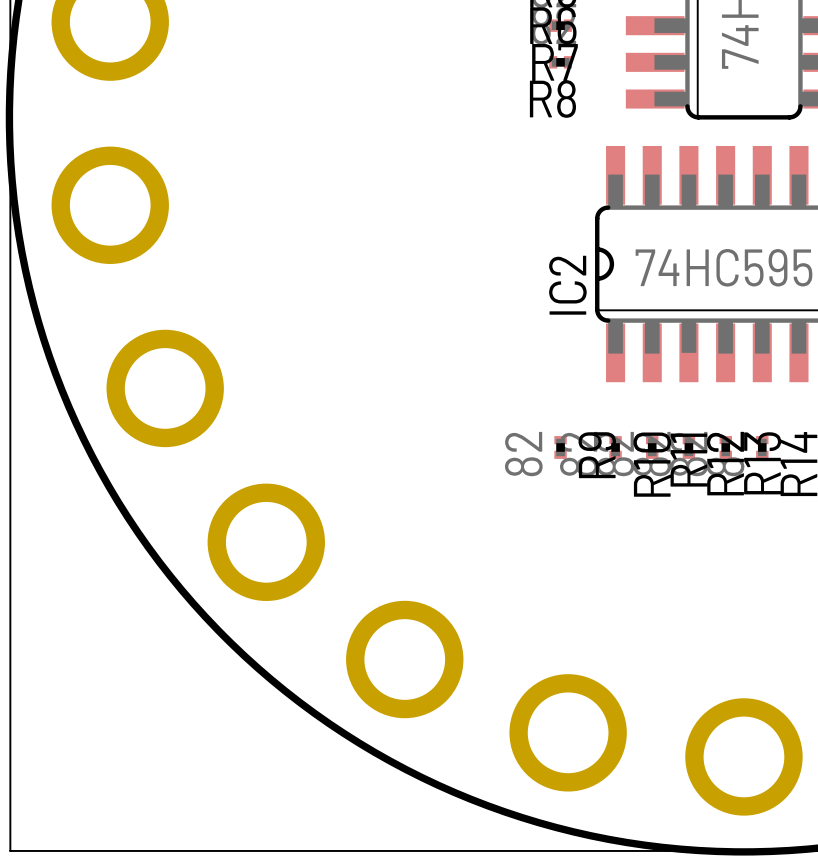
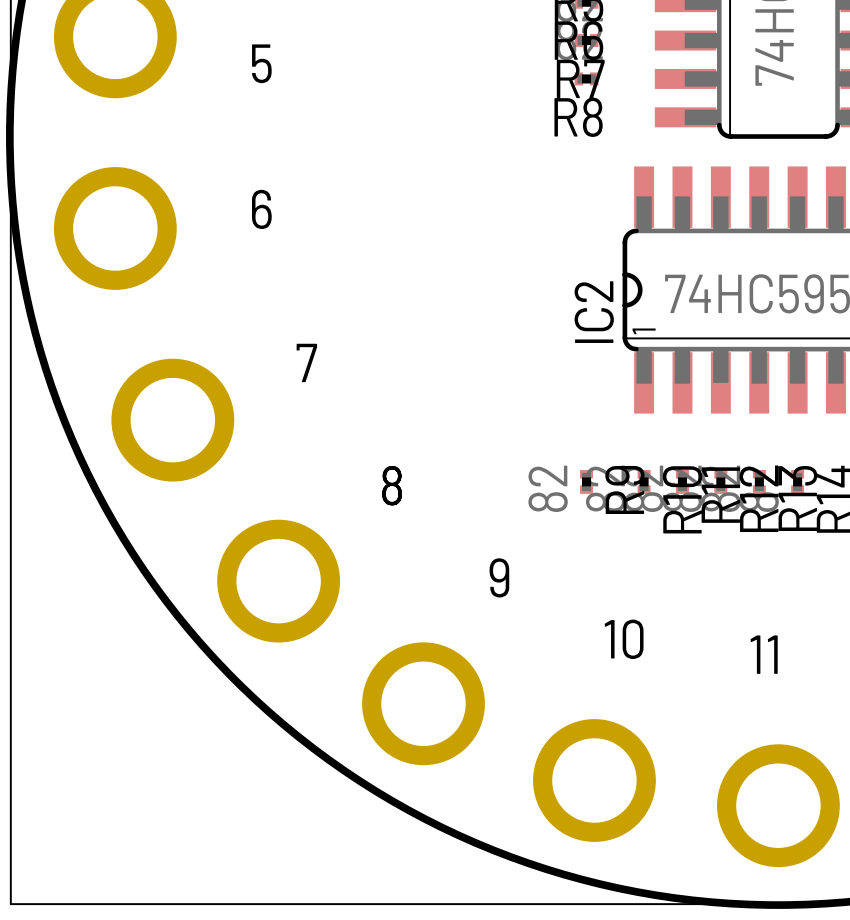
text: none -> 5 (261, 63)
text: none -> 6 (261, 209)
text: none -> 1 (644, 331)
text: none -> 7 (306, 362)
text: none -> 8 (392, 485)
text: none -> 9 (499, 577)
text: none -> 10 (624, 639)
text: none -> 11 (764, 654)

